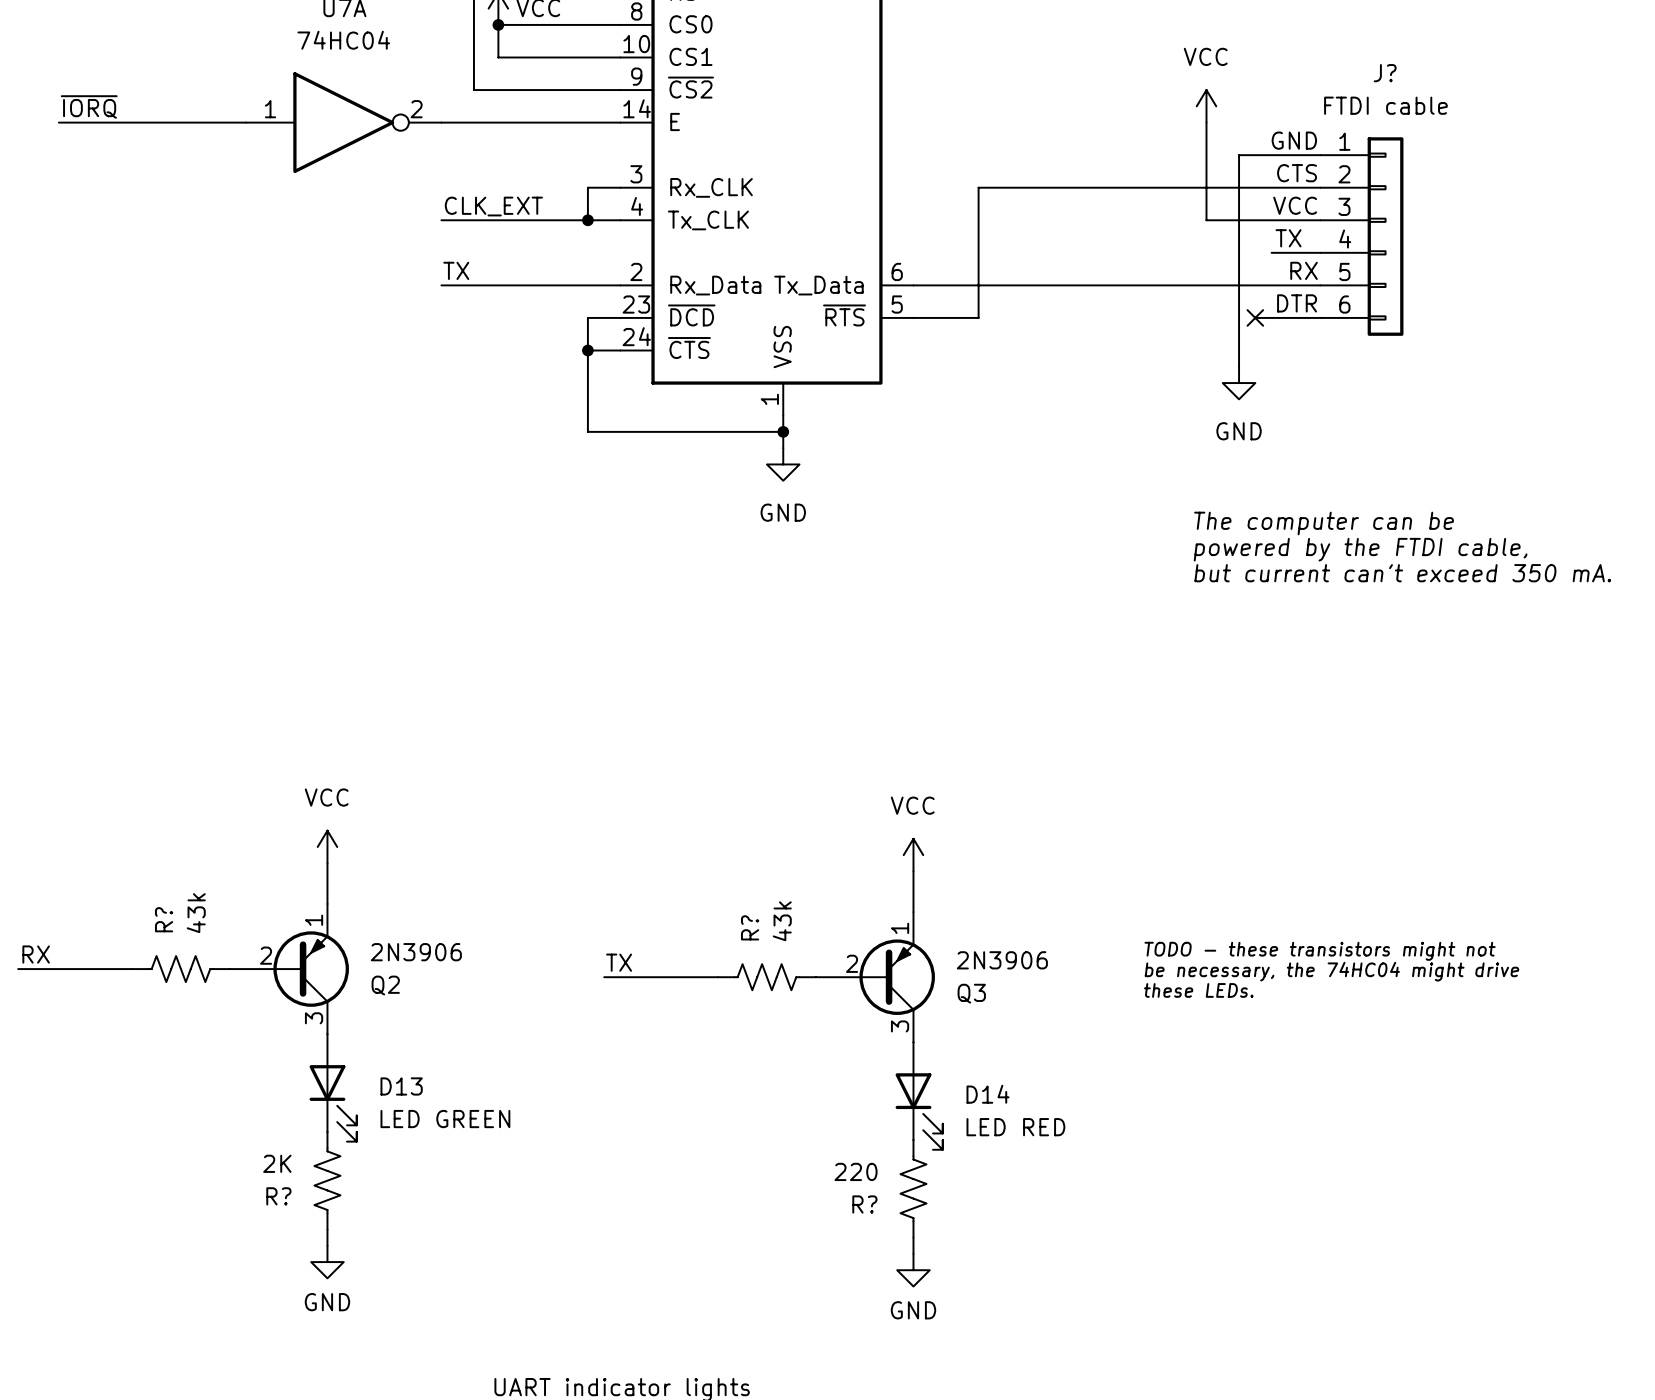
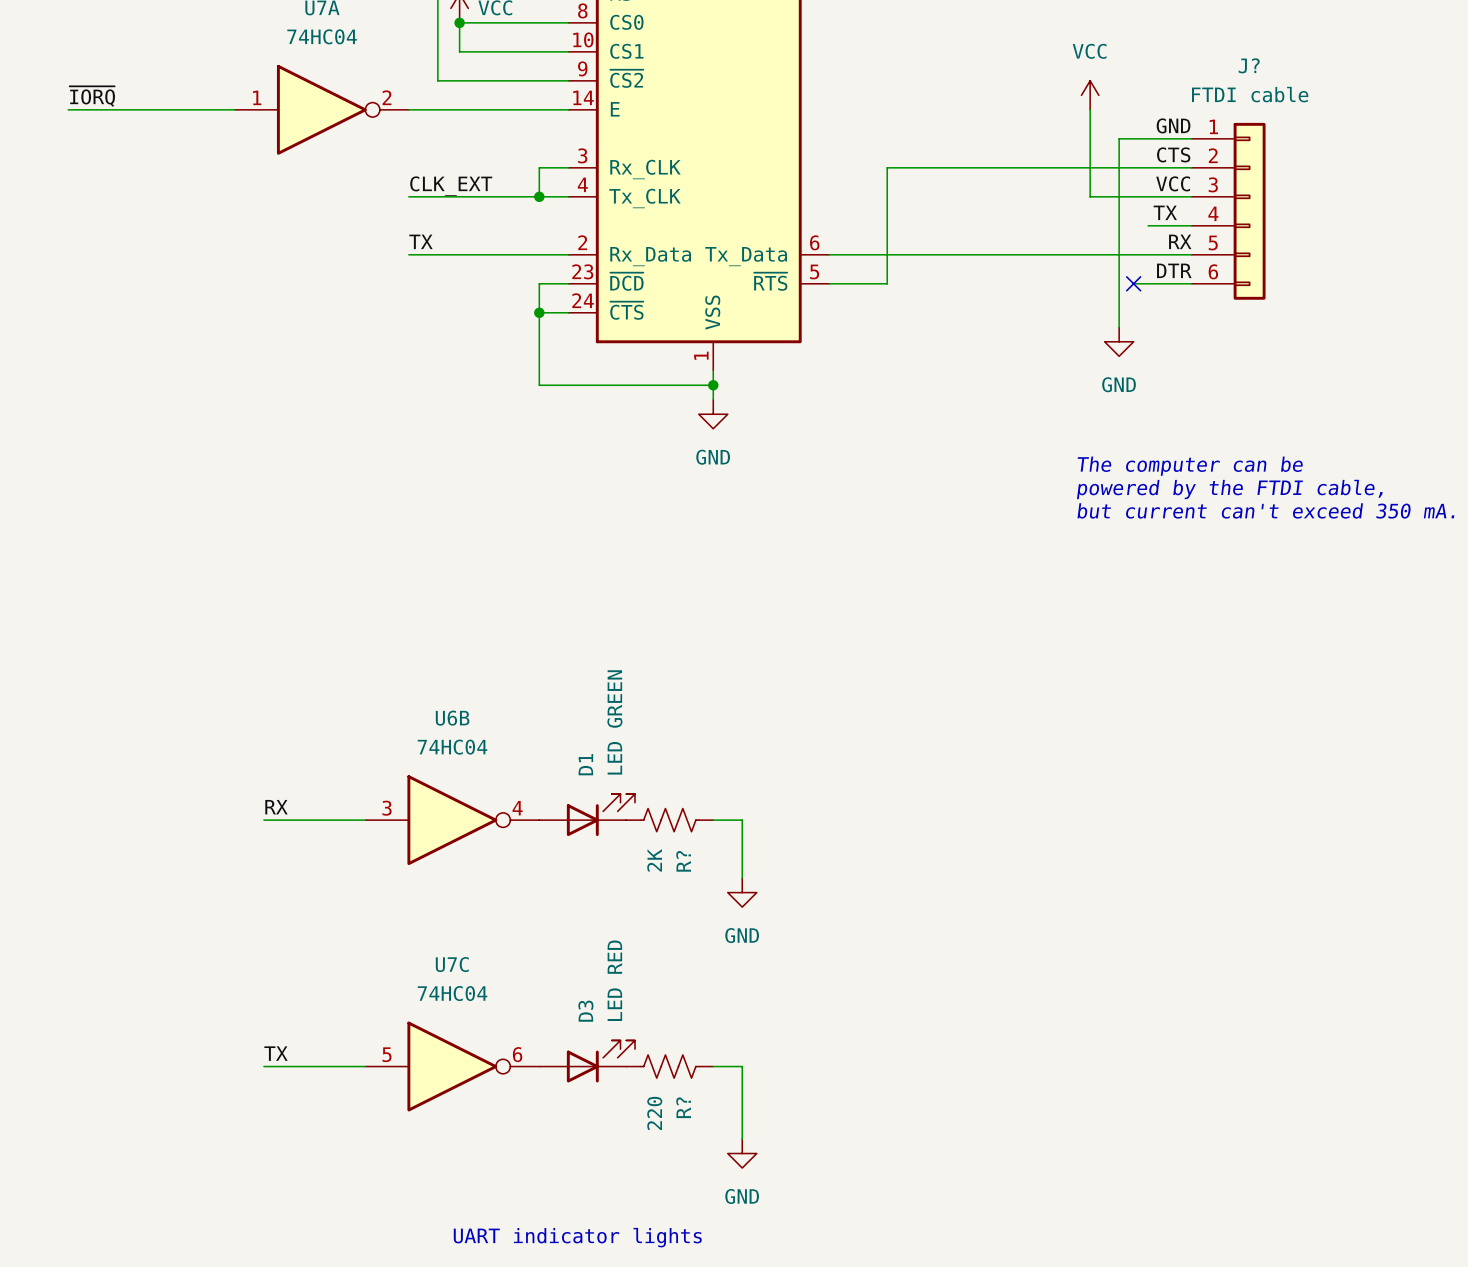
power symbol: VCC (327, 846) -> none
power symbol: VCC (913, 855) -> none
wire: (327, 863) (327, 903) -> none
wire: (913, 871) (913, 912) -> none
D1: none -> LED GREEN (587, 815)
U6B: none -> 74HC04 (452, 820)
R?: none -> 2K (669, 820)
wire: none -> (713, 820) (742, 820) (742, 878)
text: TODO - these transistors might not (1320, 951) -> none
label position: RX (36, 954) -> RX (276, 807)
label: TX (619, 962) -> none
wire: (18, 969) (132, 969) -> (263, 820) (365, 820)
R?: 43k (180, 969) -> none
Q2: 2N3906 (289, 969) -> none
text: be necessary, the 74HC04 might drive (1331, 971) -> none
wire: (604, 977) (718, 977) -> none
R?: 43k (766, 977) -> none
Q3: 2N3906 (875, 977) -> none
text: these LEDs. (1198, 990) -> none
power symbol: none -> GND (742, 892)
D13: LED GREEN (333, 1087) -> none
D14: LED RED (919, 1096) -> none
R? value position: 220 (856, 1171) -> 220 (654, 1113)
R?: 2K (327, 1180) -> none
label: none -> TX (276, 1053)
R? rotation: 0° (913, 1188) -> 90° clockwise (669, 1066)
R? position: (913, 1188) -> (669, 1066)
D3: none -> LED RED (587, 1061)
wire: none -> (263, 1066) (365, 1066)
U7C: none -> 74HC04 (452, 1066)
wire: none -> (713, 1066) (742, 1066) (742, 1139)
R? name position: R? (864, 1204) -> R? (683, 1107)
wire: (327, 1229) (327, 1245) -> none
wire: (913, 1237) (913, 1253) -> none
power symbol: GND (327, 1262) -> none
power symbol position: GND (913, 1270) -> GND (742, 1153)
power symbol text position: GND (913, 1310) -> GND (742, 1196)

